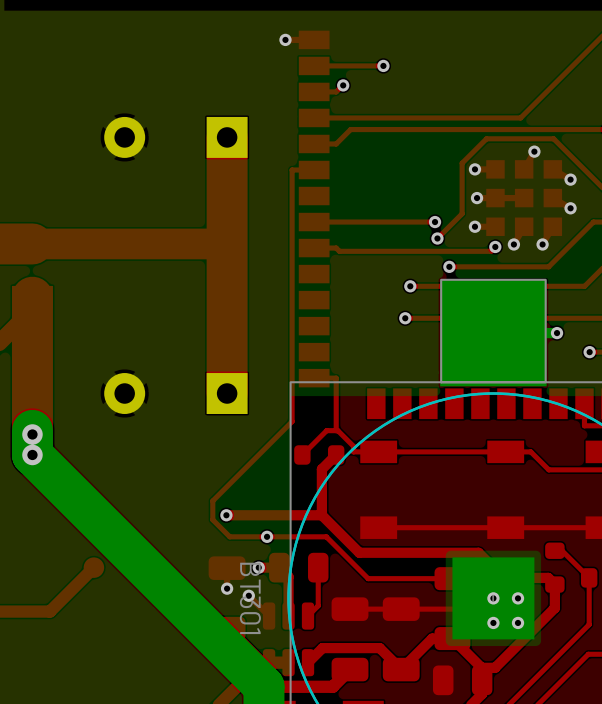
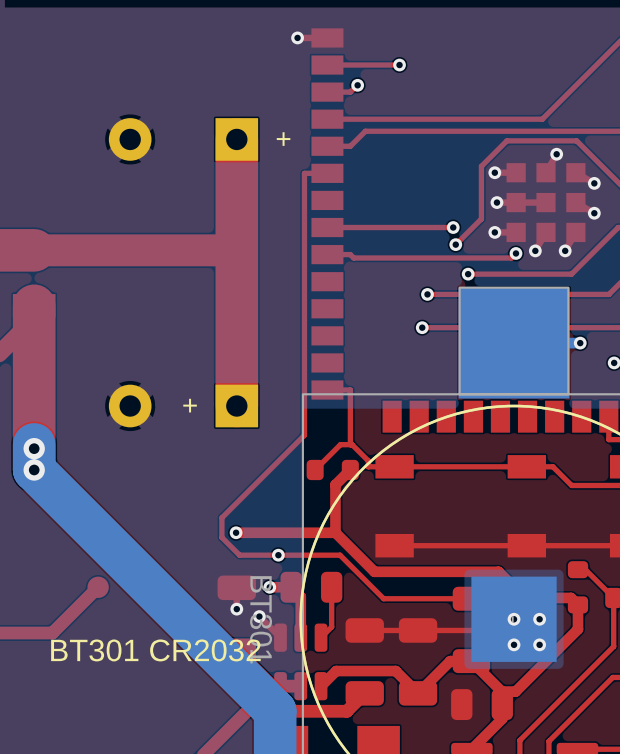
text: none -> + (283, 139)
text: none -> + (190, 405)
text: none -> BT301 CR2032 (155, 650)

